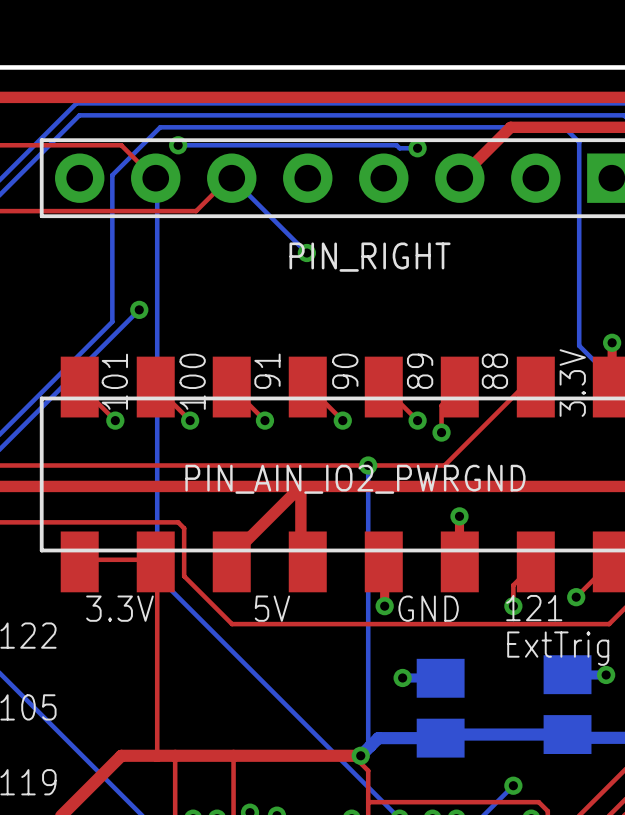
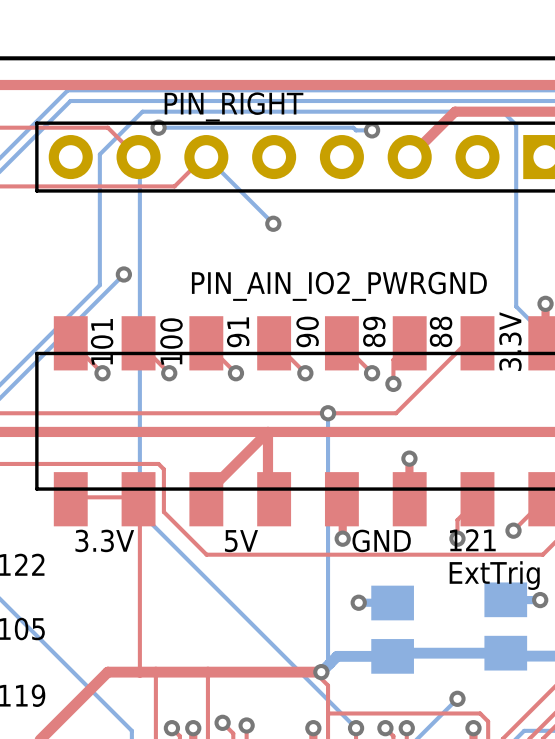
PIN_RIGHT name position: PIN_RIGHT (370, 257) -> PIN_RIGHT (234, 106)
PIN_AIN_IO2_PWRGND name position: PIN_AIN_IO2_PWRGND (355, 479) -> PIN_AIN_IO2_PWRGND (339, 286)

